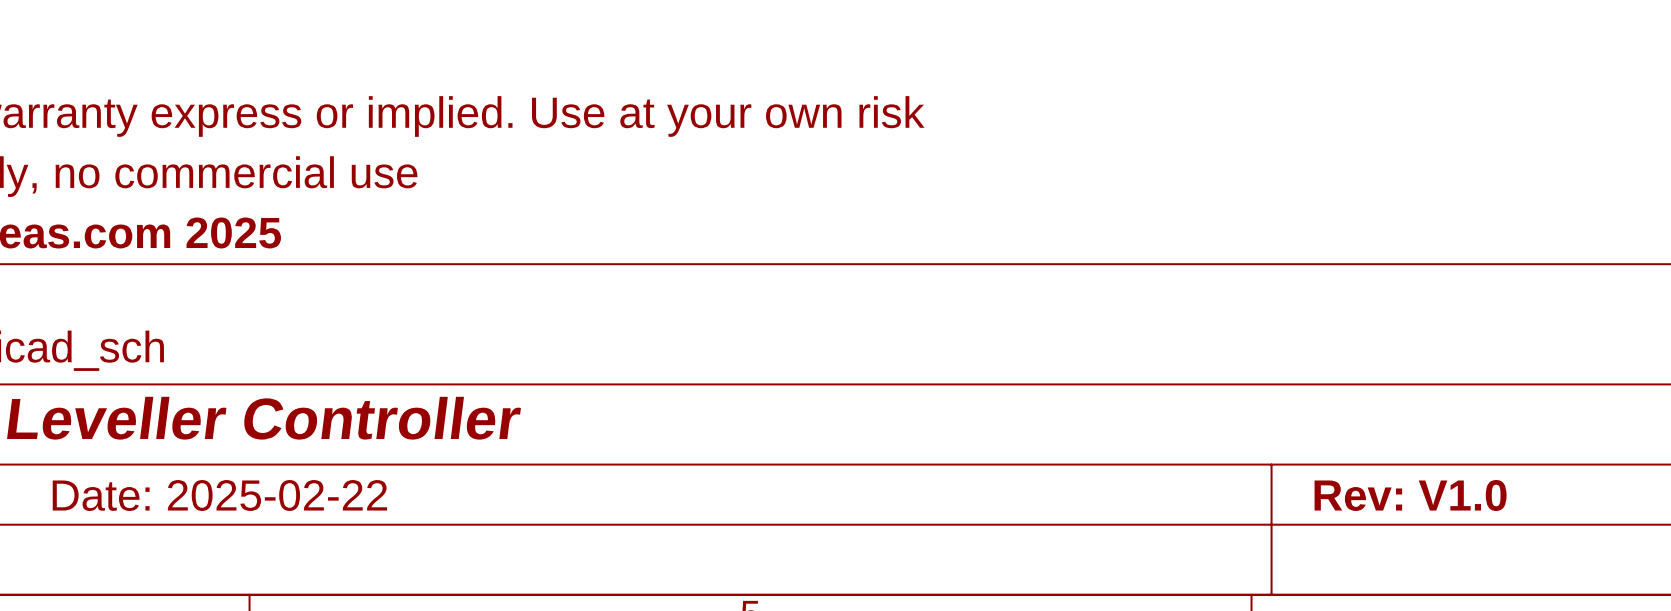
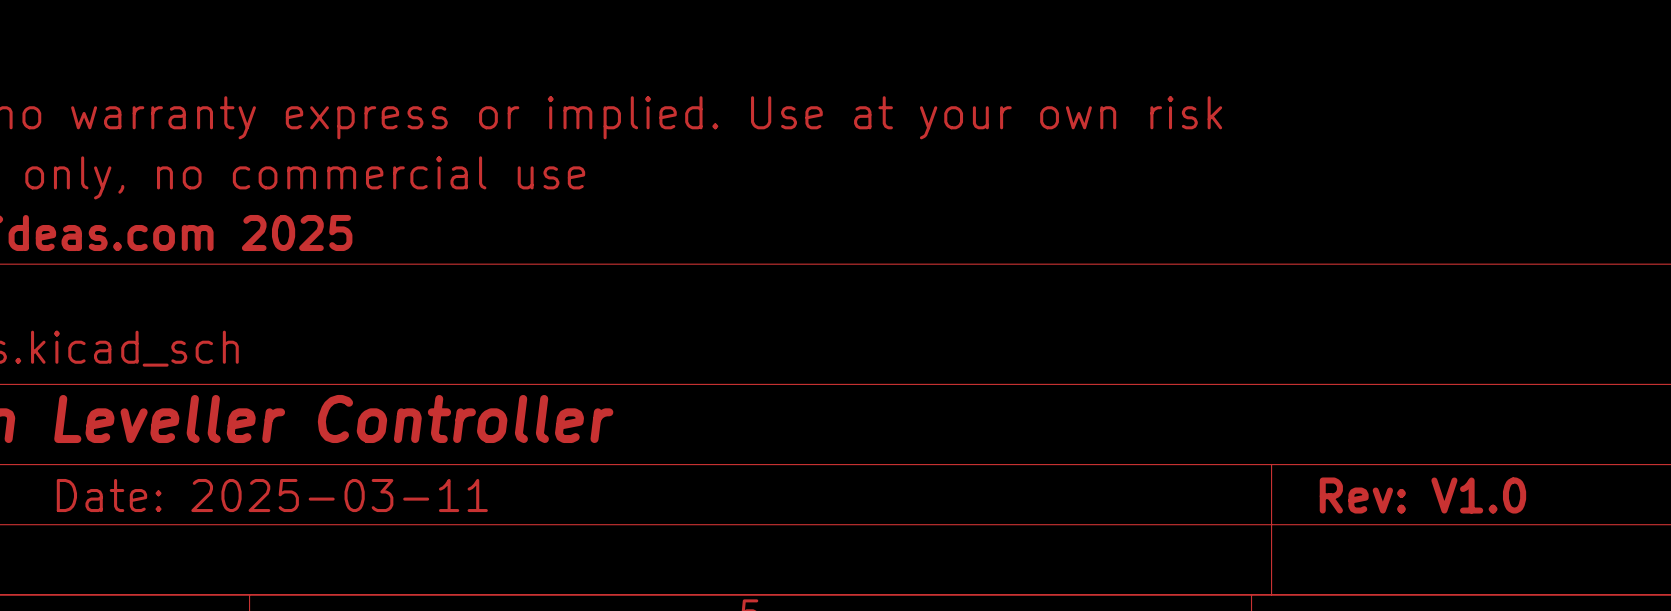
title block: Date: 2025-02-22 (219, 495) -> Date: 2025-03-11 (272, 495)

